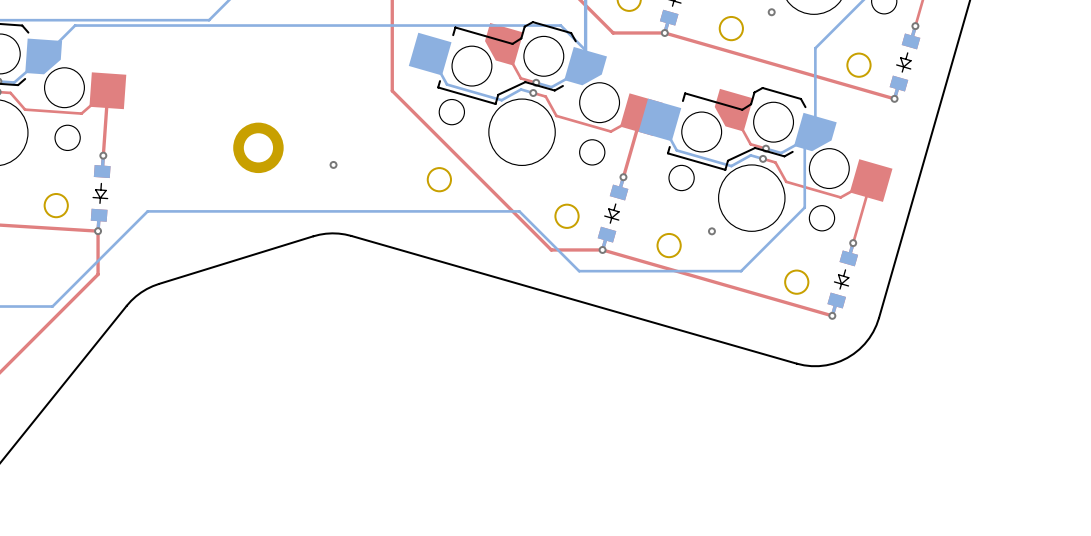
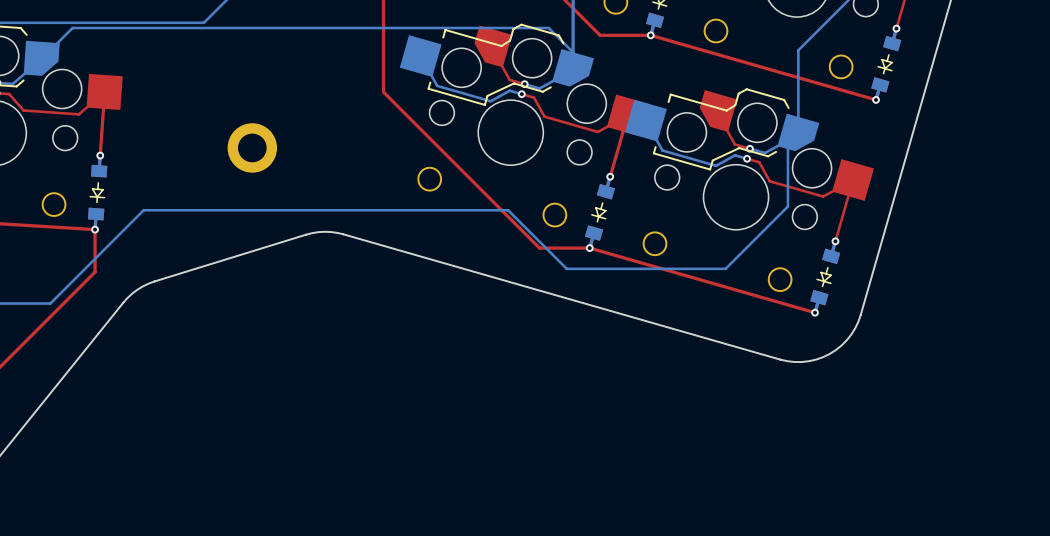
via: (771, 12) -> none
via: (333, 164) -> none
via: (711, 231) -> none

